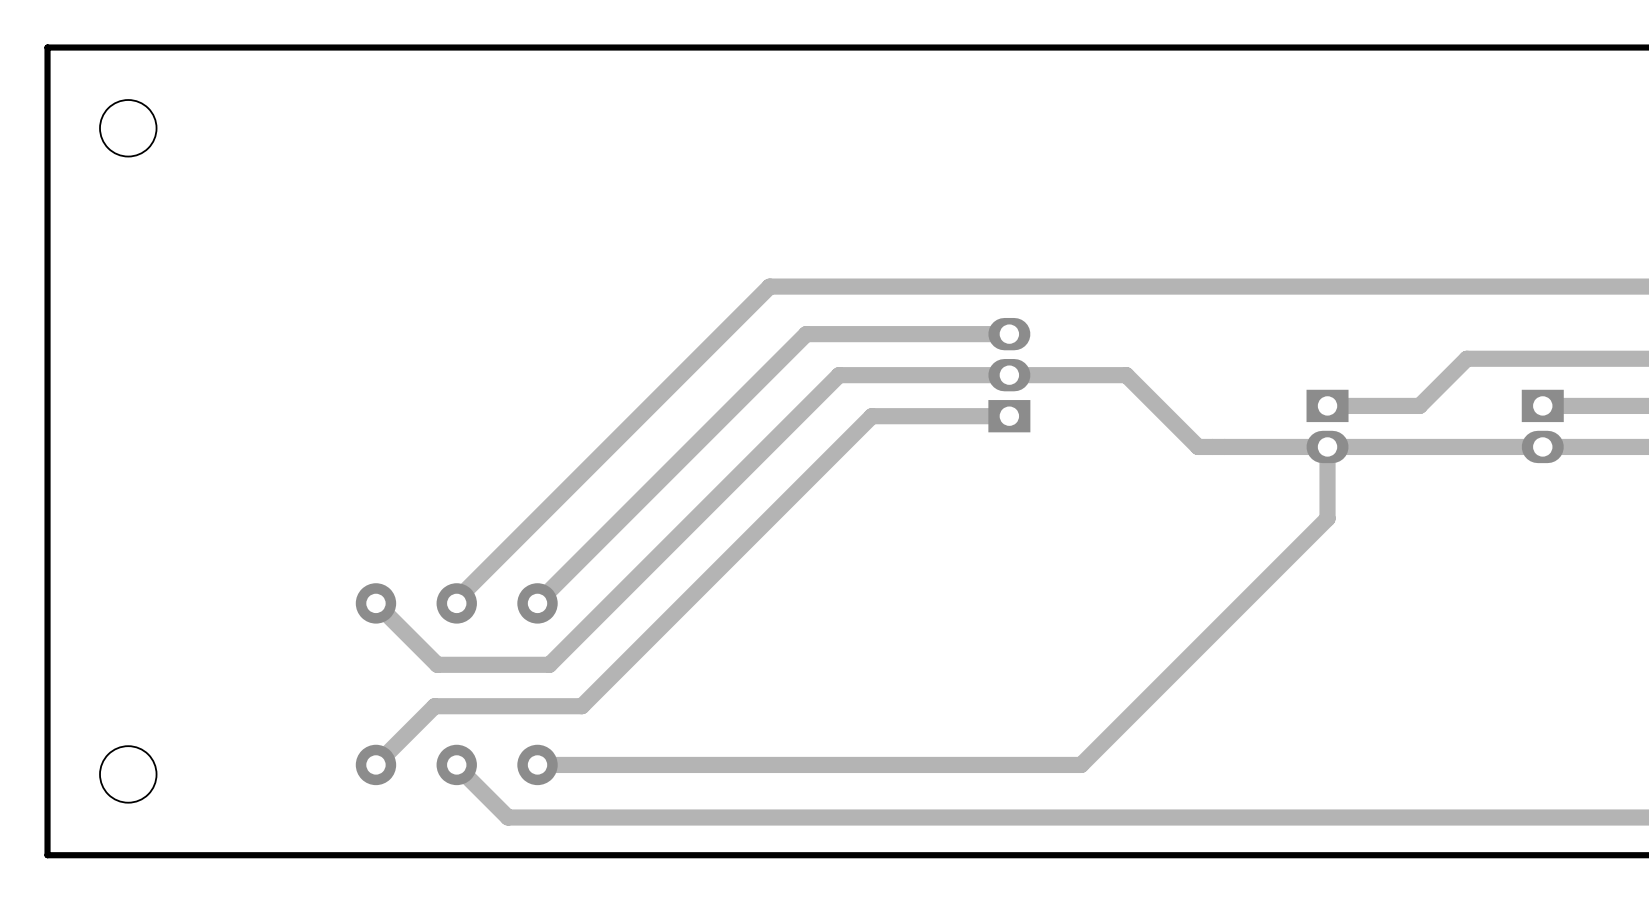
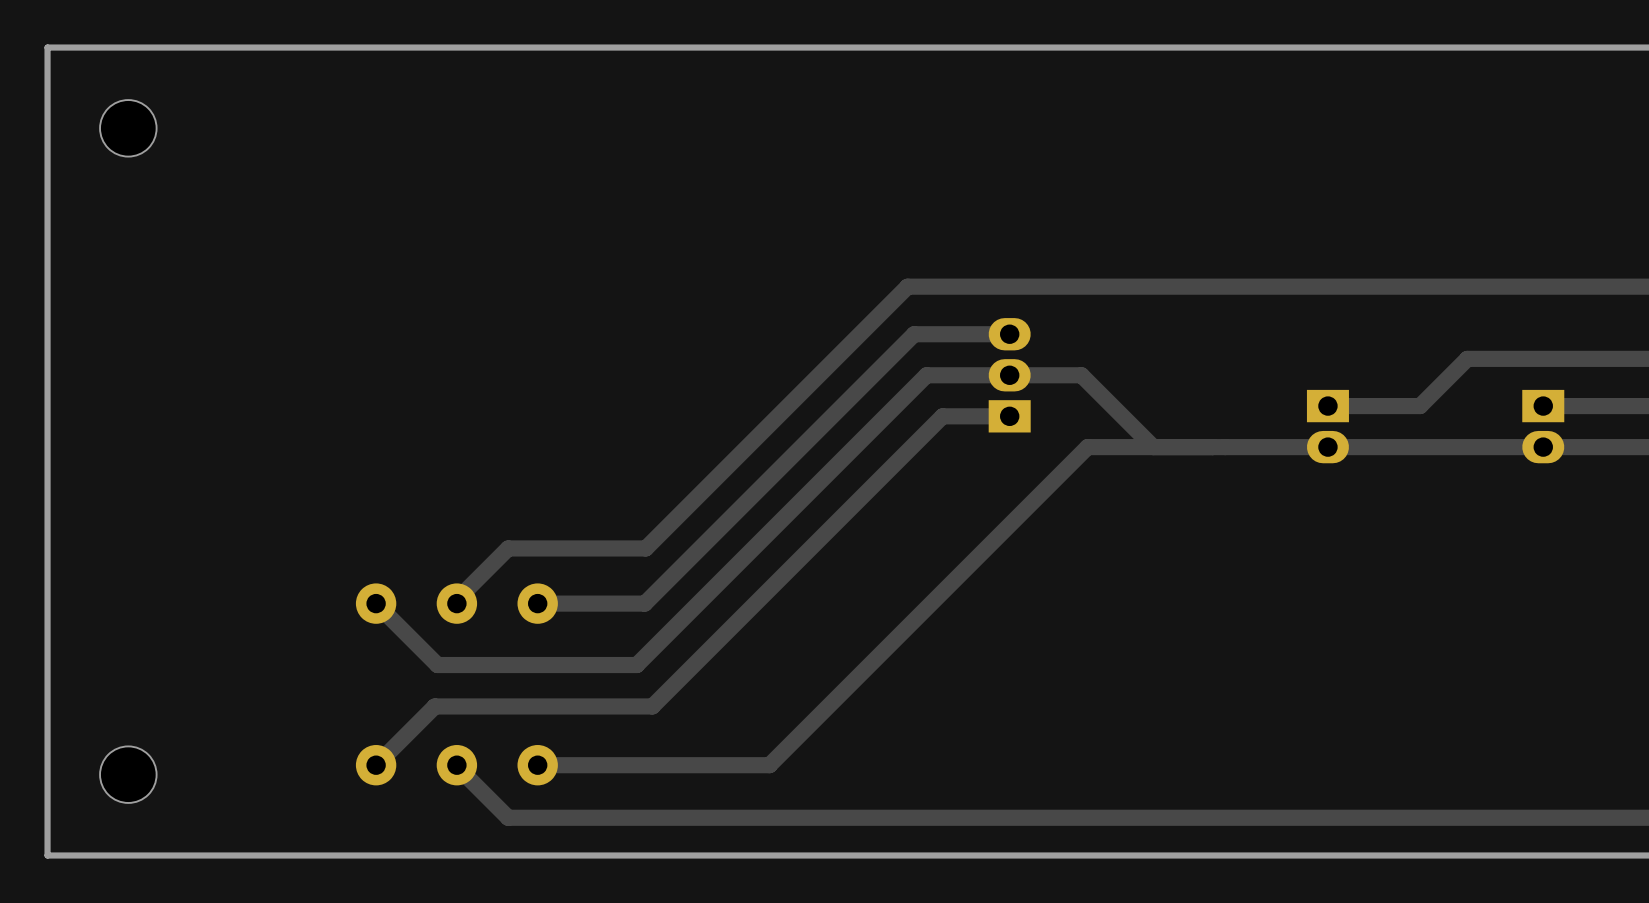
track: (907, 286) (769, 286) (508, 548) -> (907, 286) (645, 548) (508, 548)
track: (913, 334) (806, 334) (537, 603) -> (914, 334) (644, 603) (537, 603)
track: (926, 375) (839, 375) (549, 664) -> (926, 375) (636, 665) (549, 665)
track: (1081, 375) (1126, 375) (1198, 446) -> (1081, 375) (1153, 447)
track: (942, 416) (871, 416) (581, 706) -> (942, 416) (652, 706) (582, 706)
track: (1327, 446) (1327, 518) (1081, 764) (769, 764) -> (1198, 447) (1087, 447) (769, 765)

